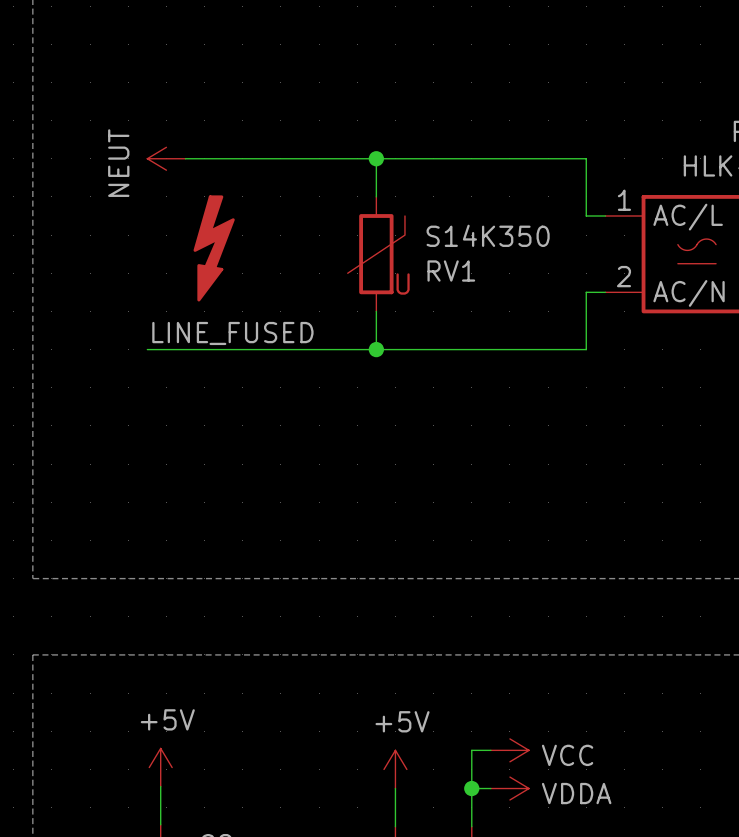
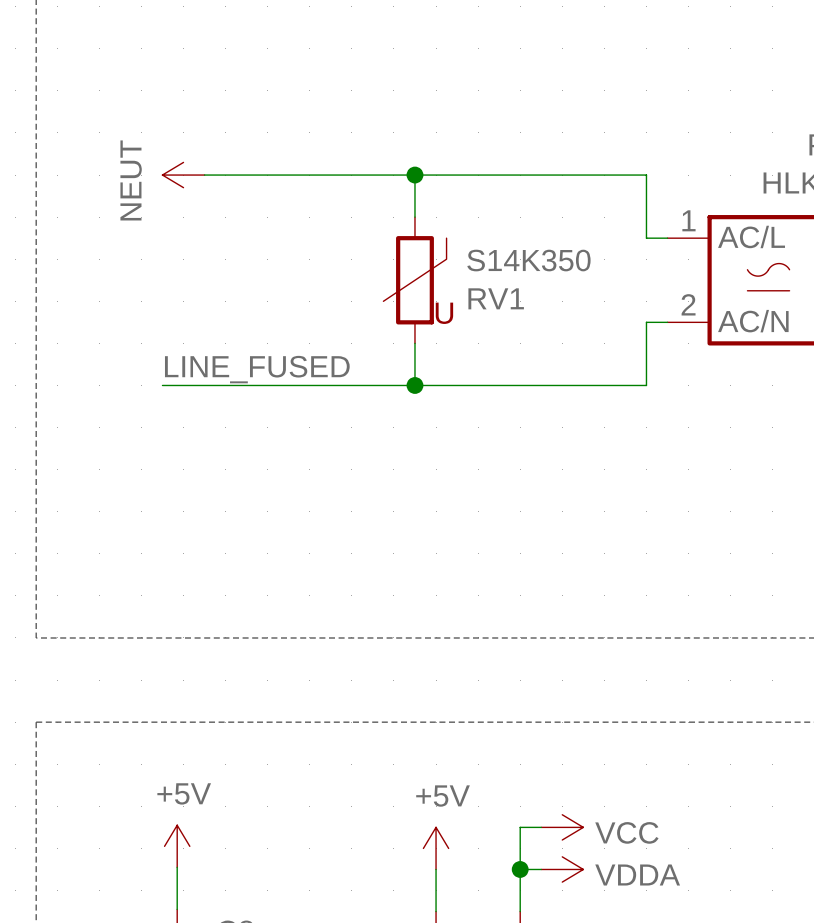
power symbol: (214, 248) -> none

